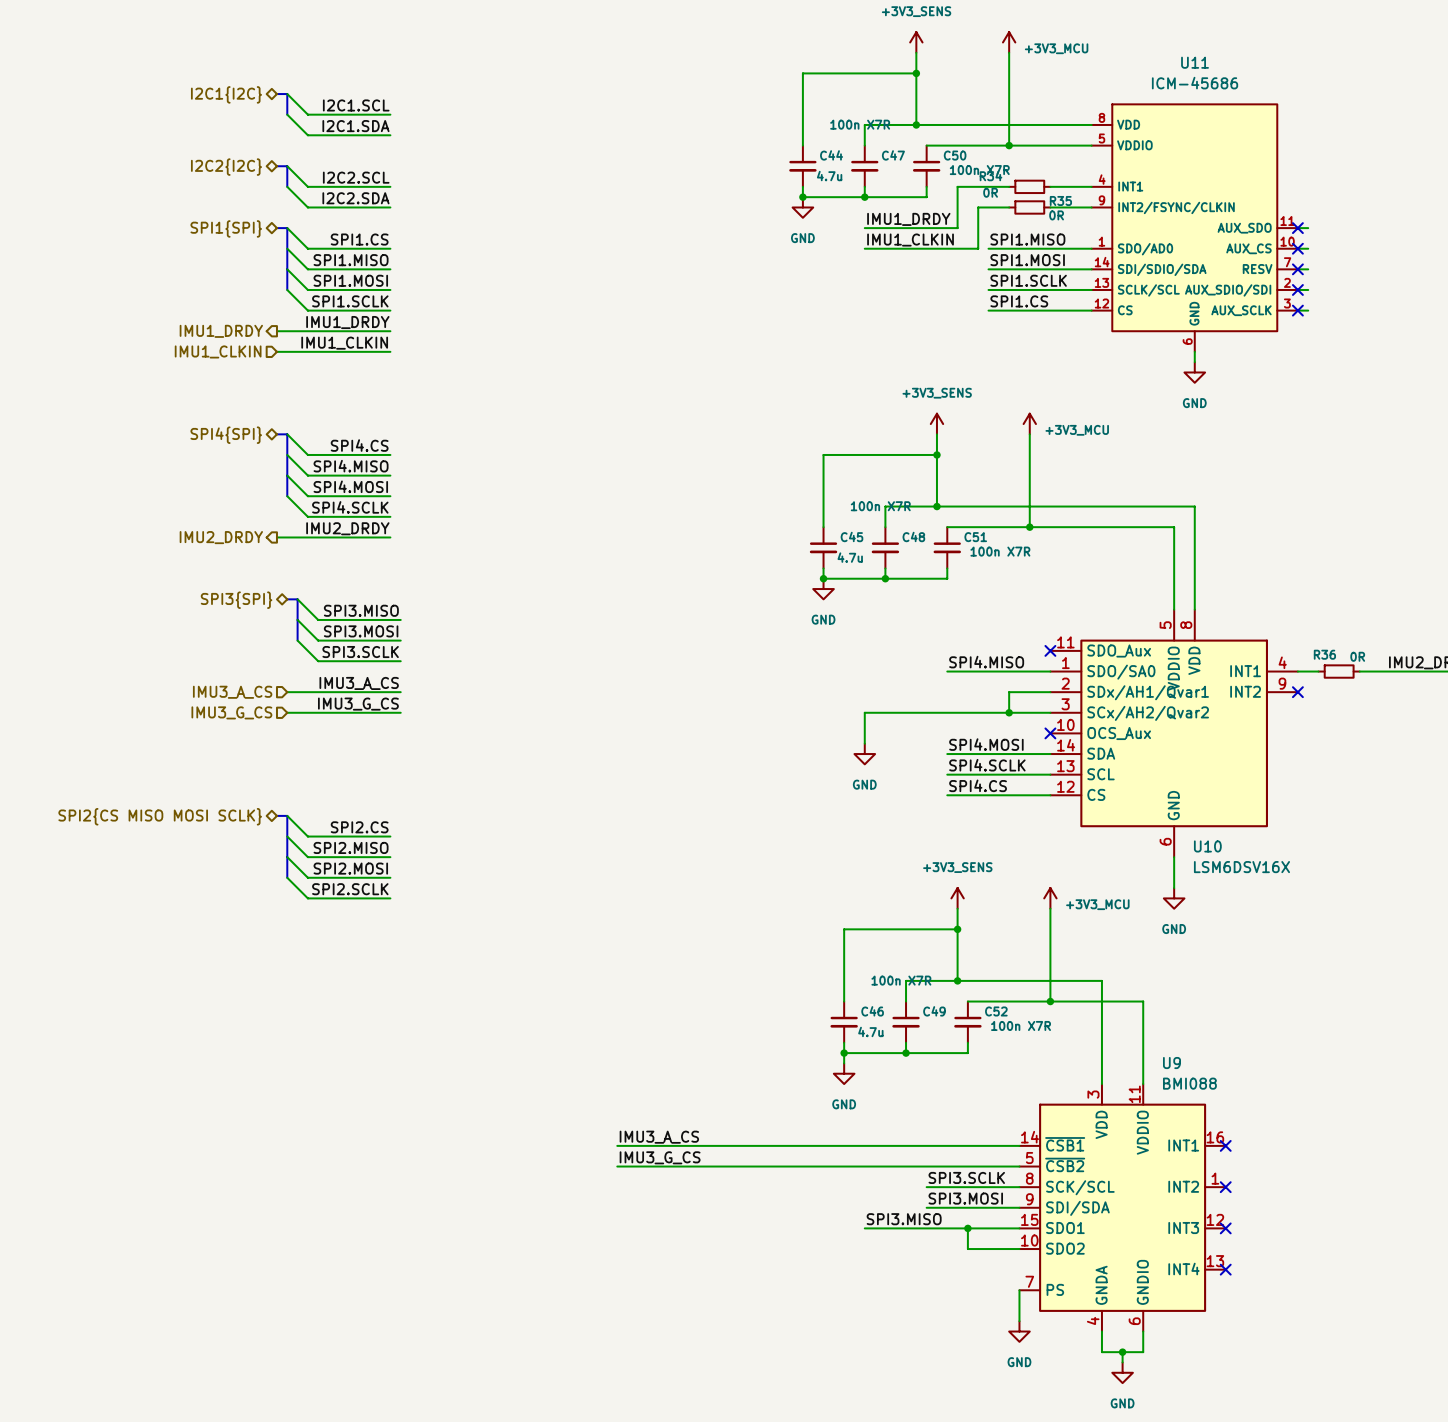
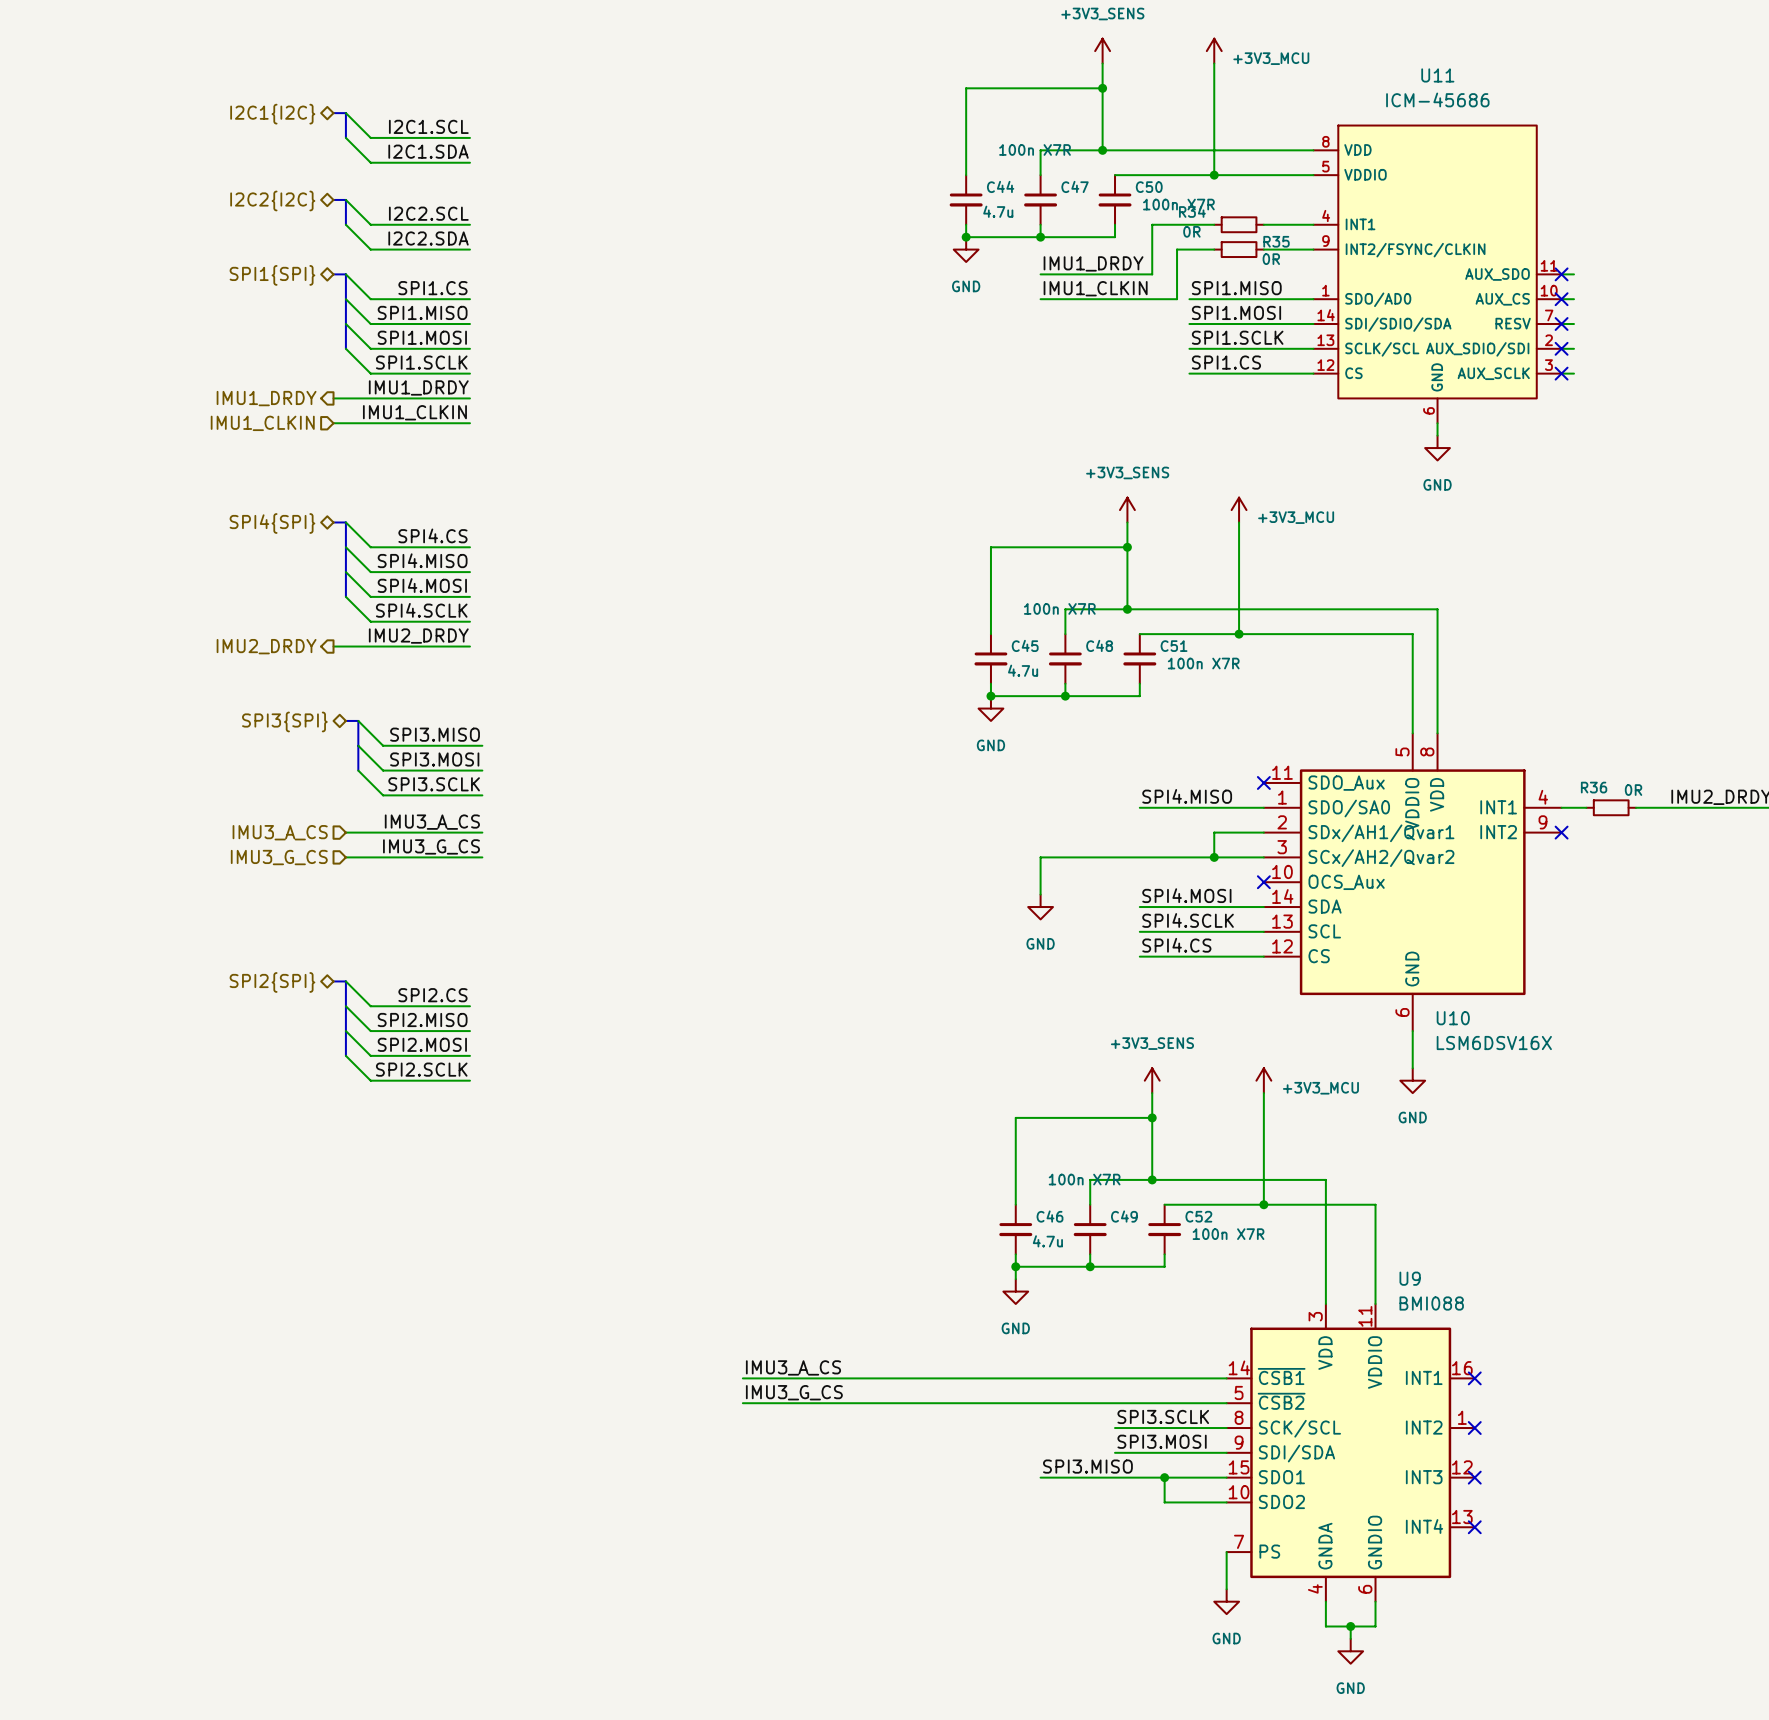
hierarchical label: SPI2{CS MISO MOSI SCLK} (160, 816) -> SPI2{SPI} (272, 982)

